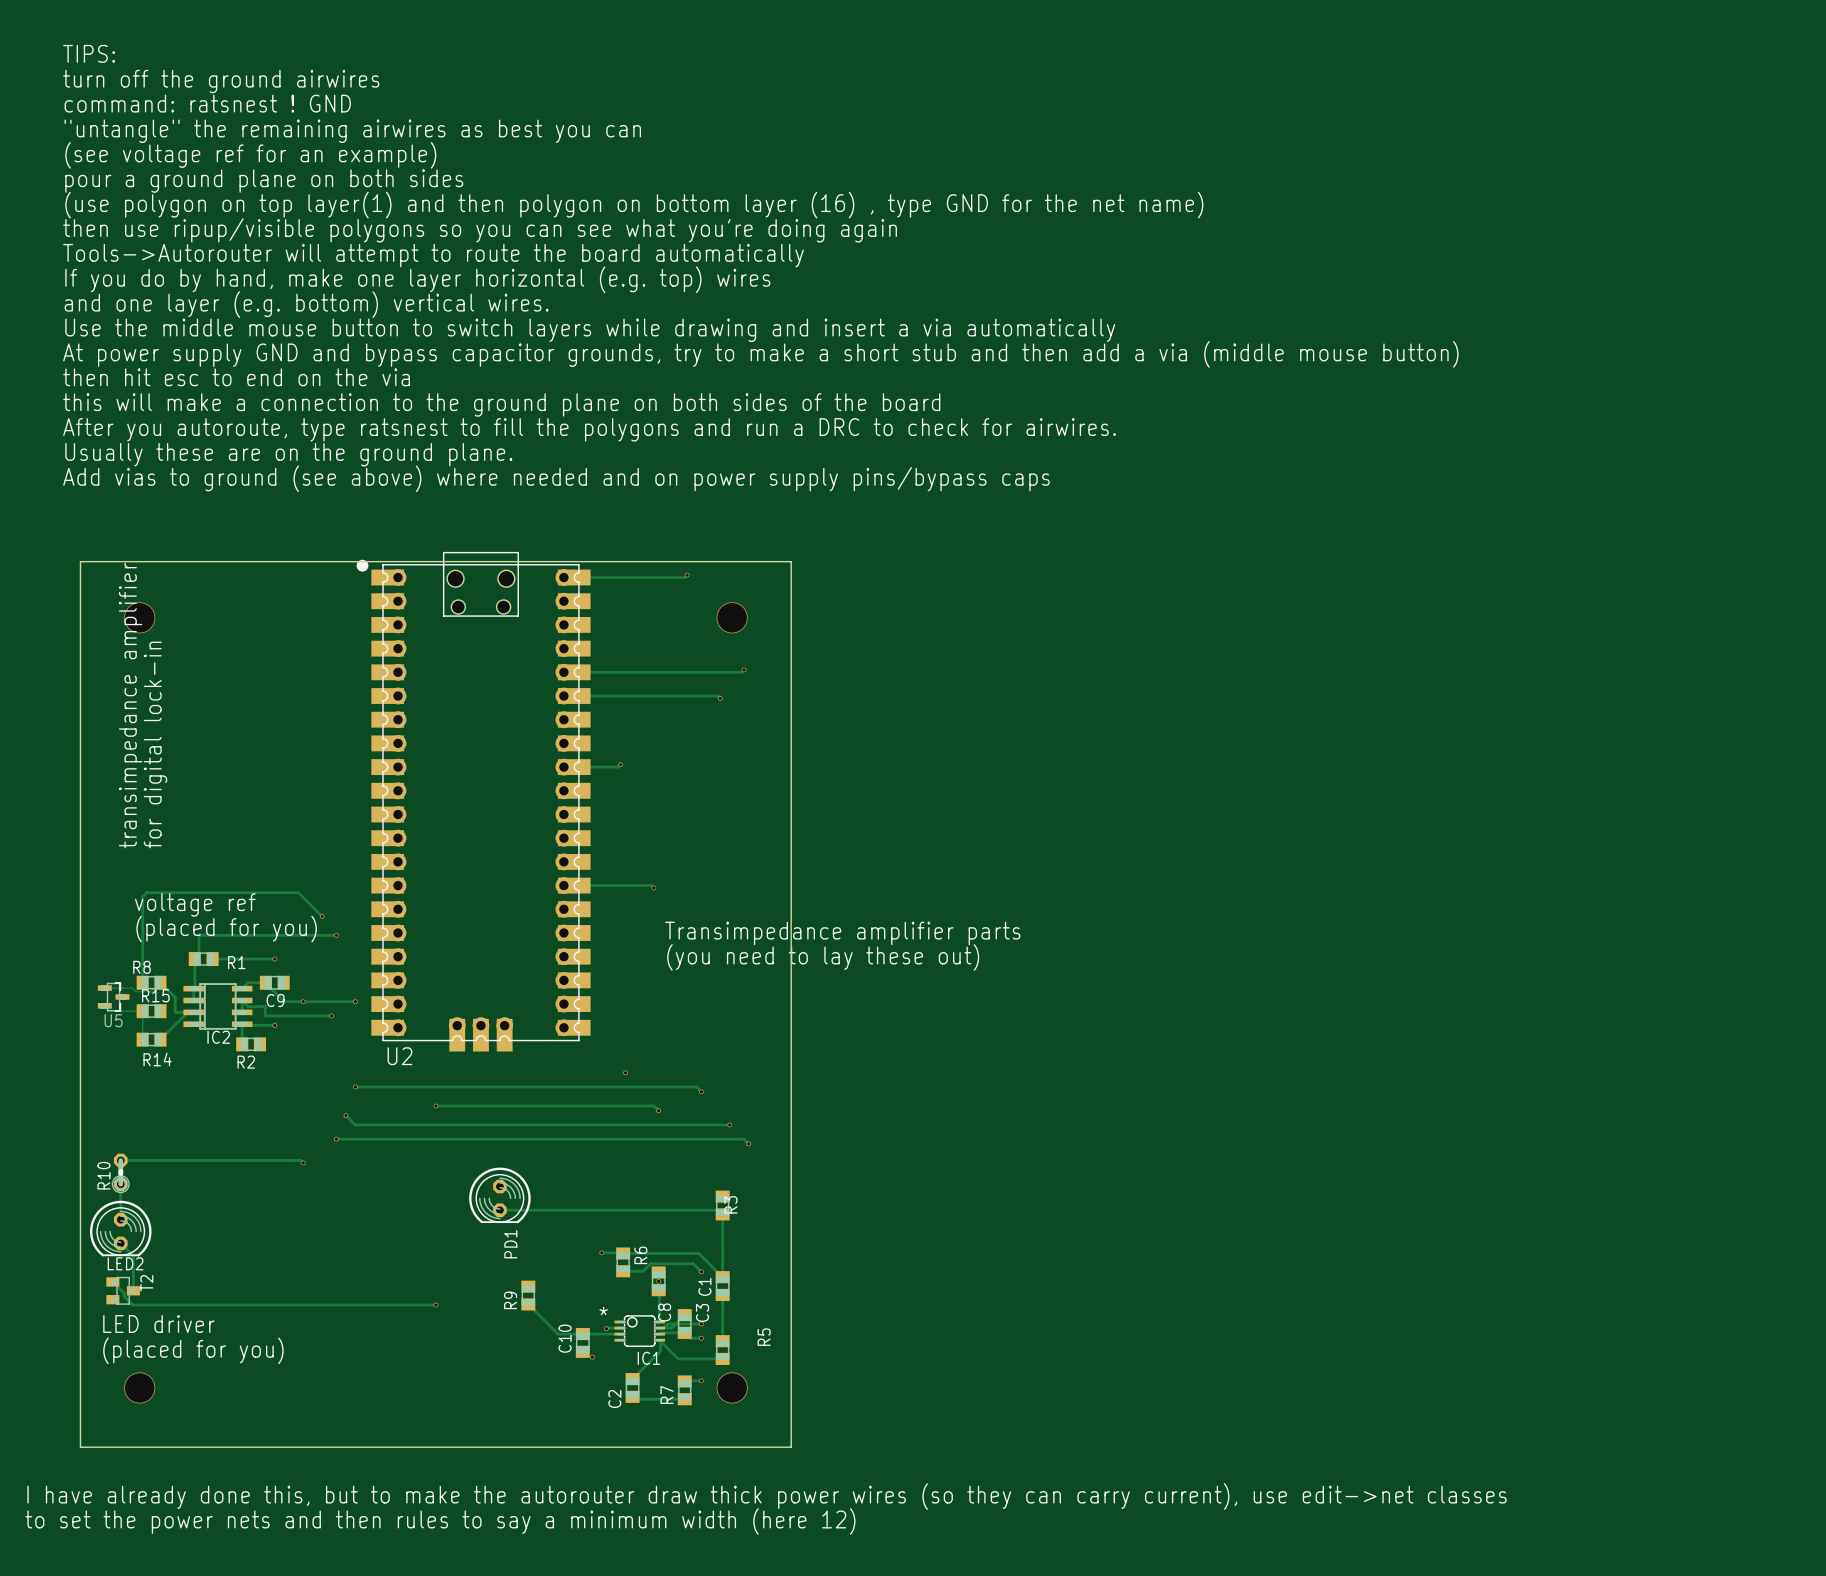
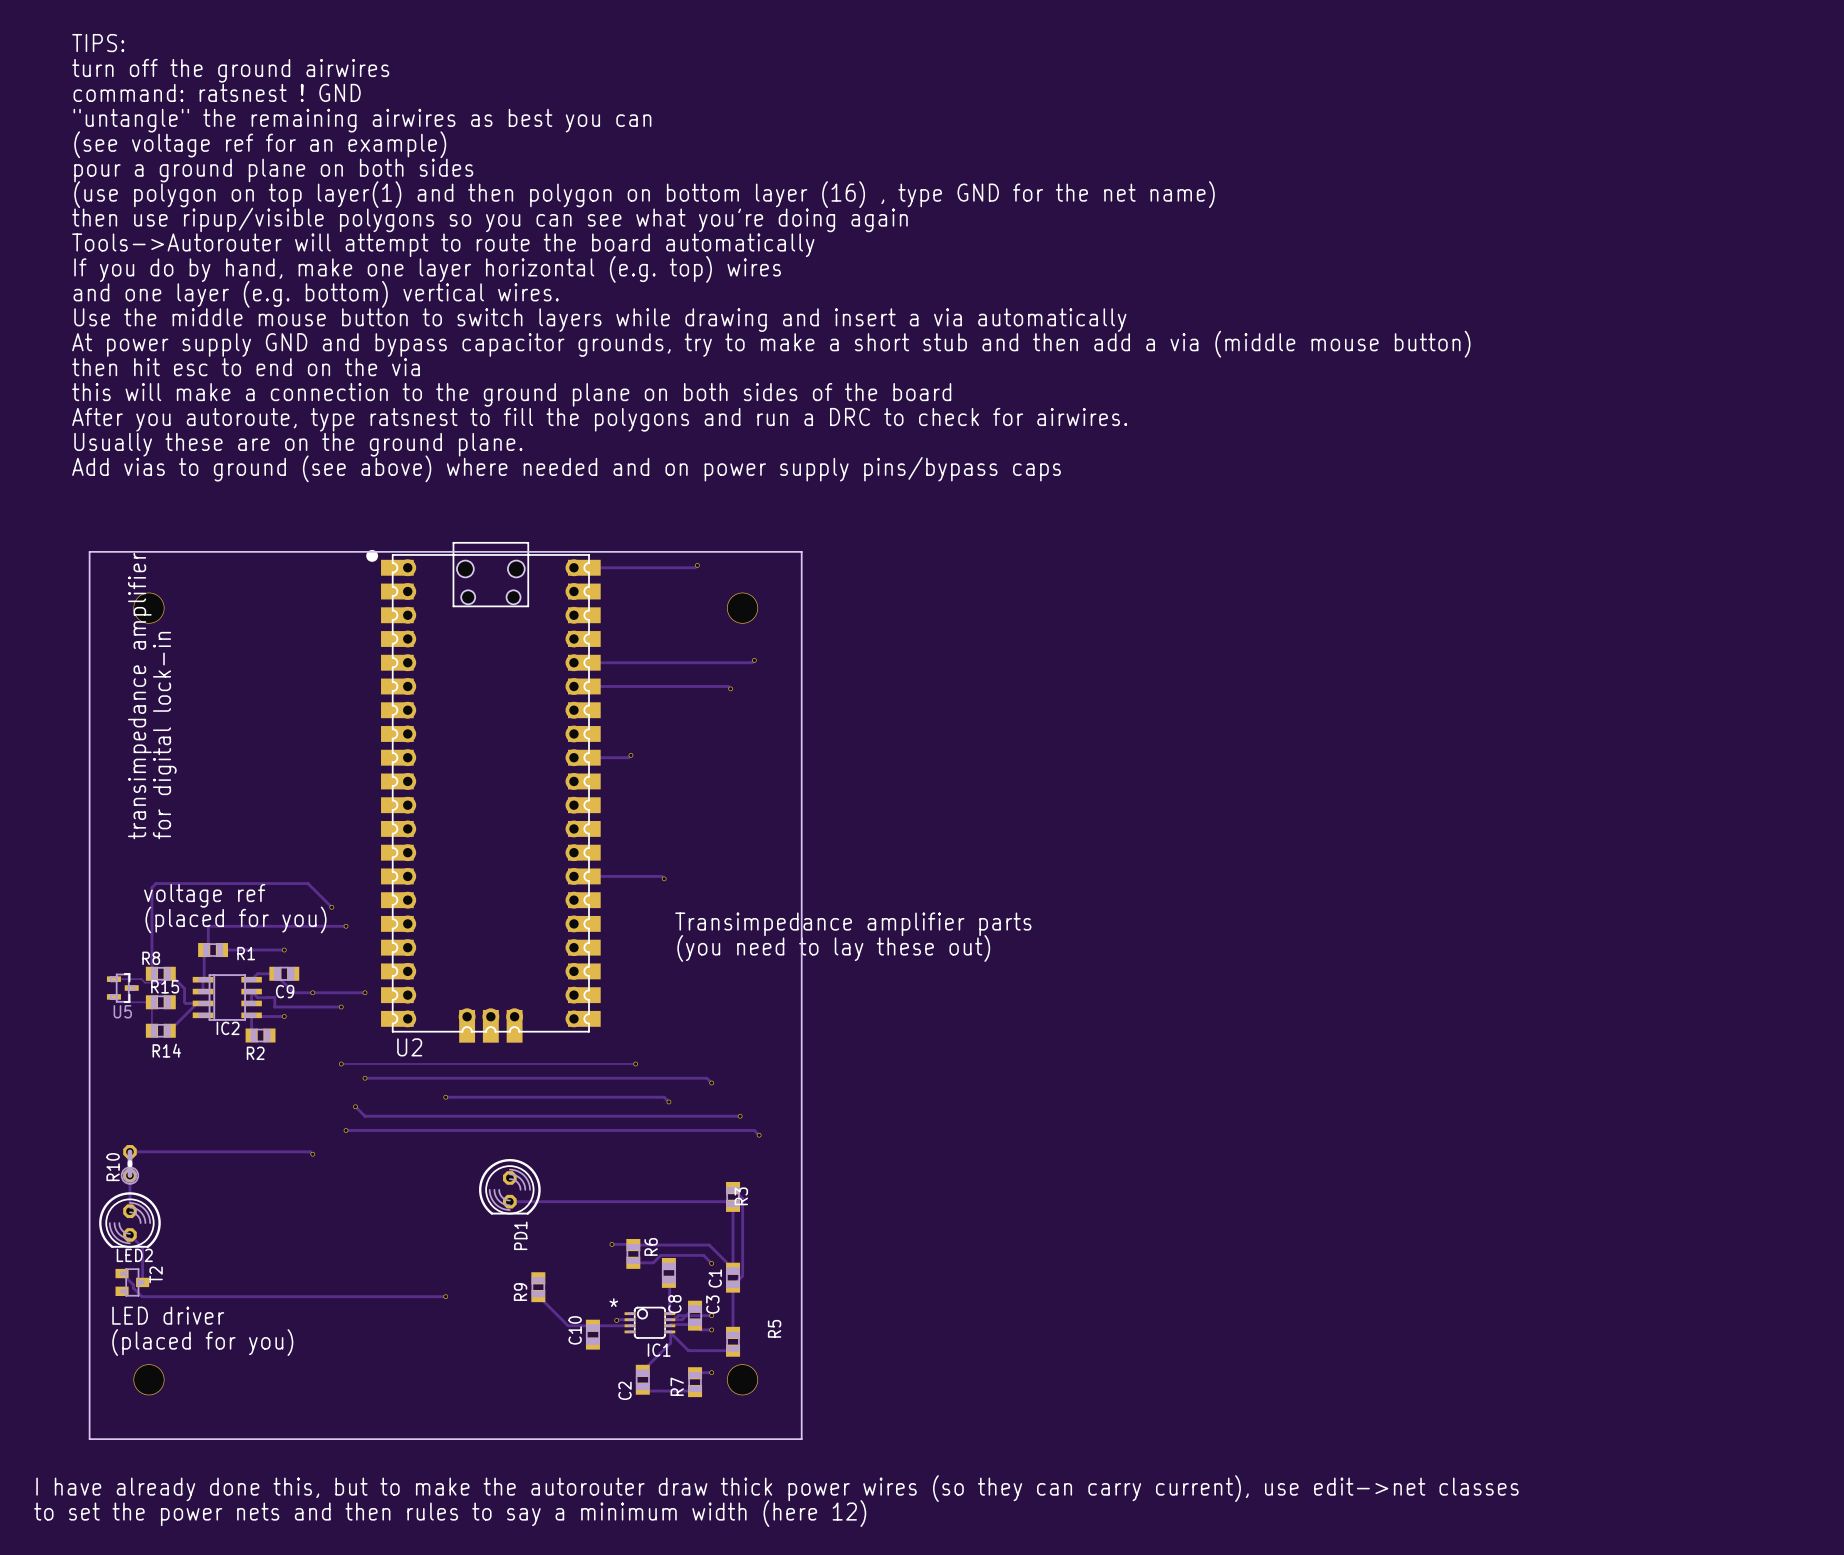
track: none -> (341, 1063) (635, 1063)
via: none -> (341, 1063)
track: none -> (733, 1188) (742, 1198) (742, 1275) (733, 1286)
via: (658, 1281) -> none
via: (592, 1357) -> none

